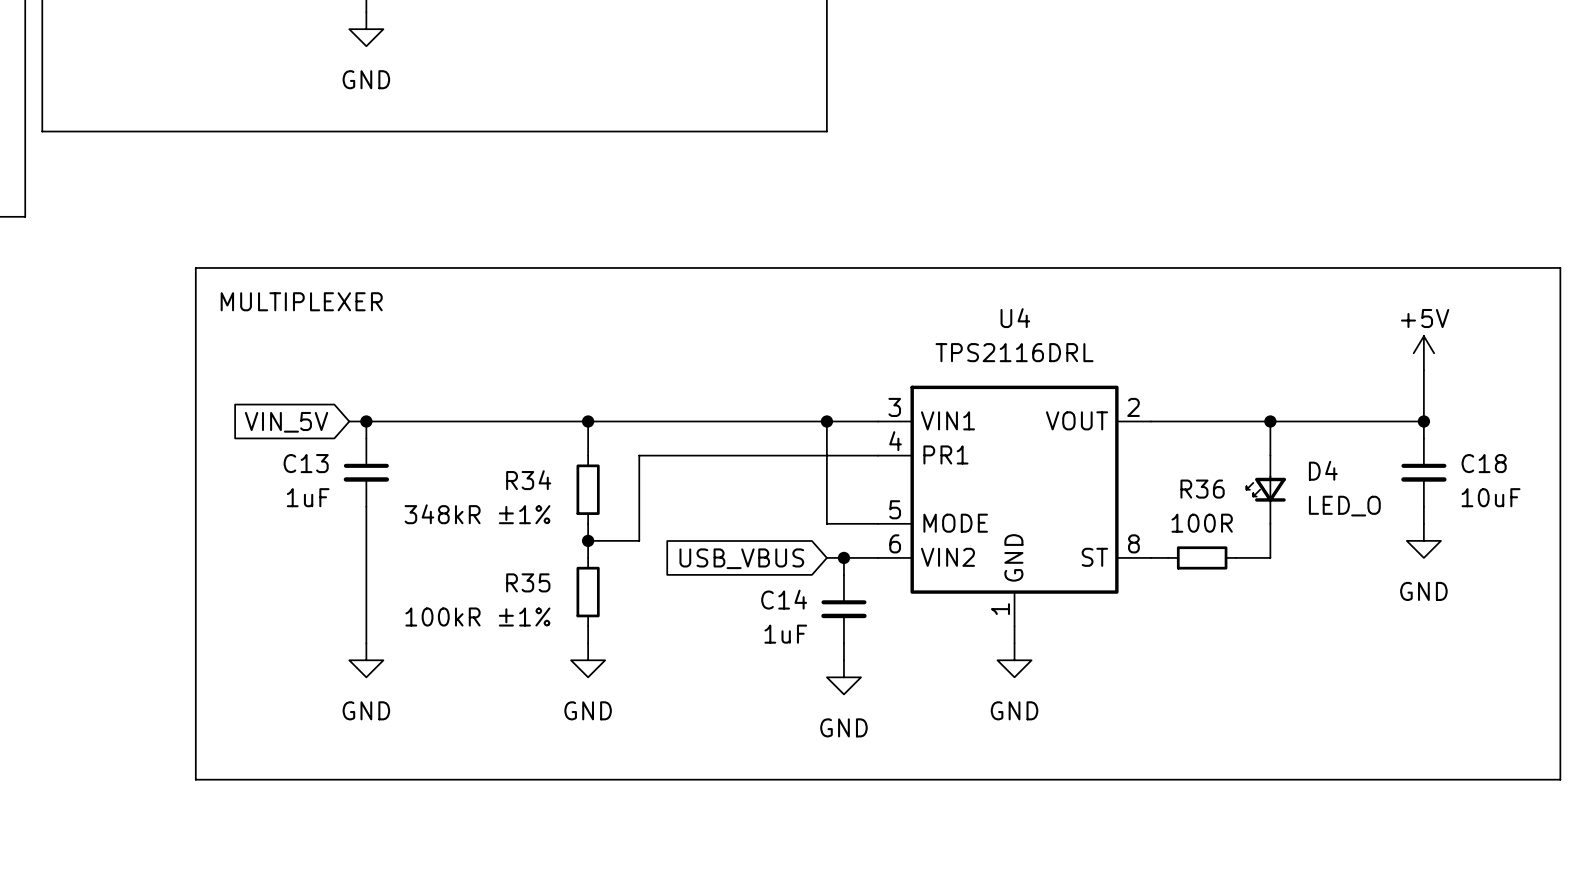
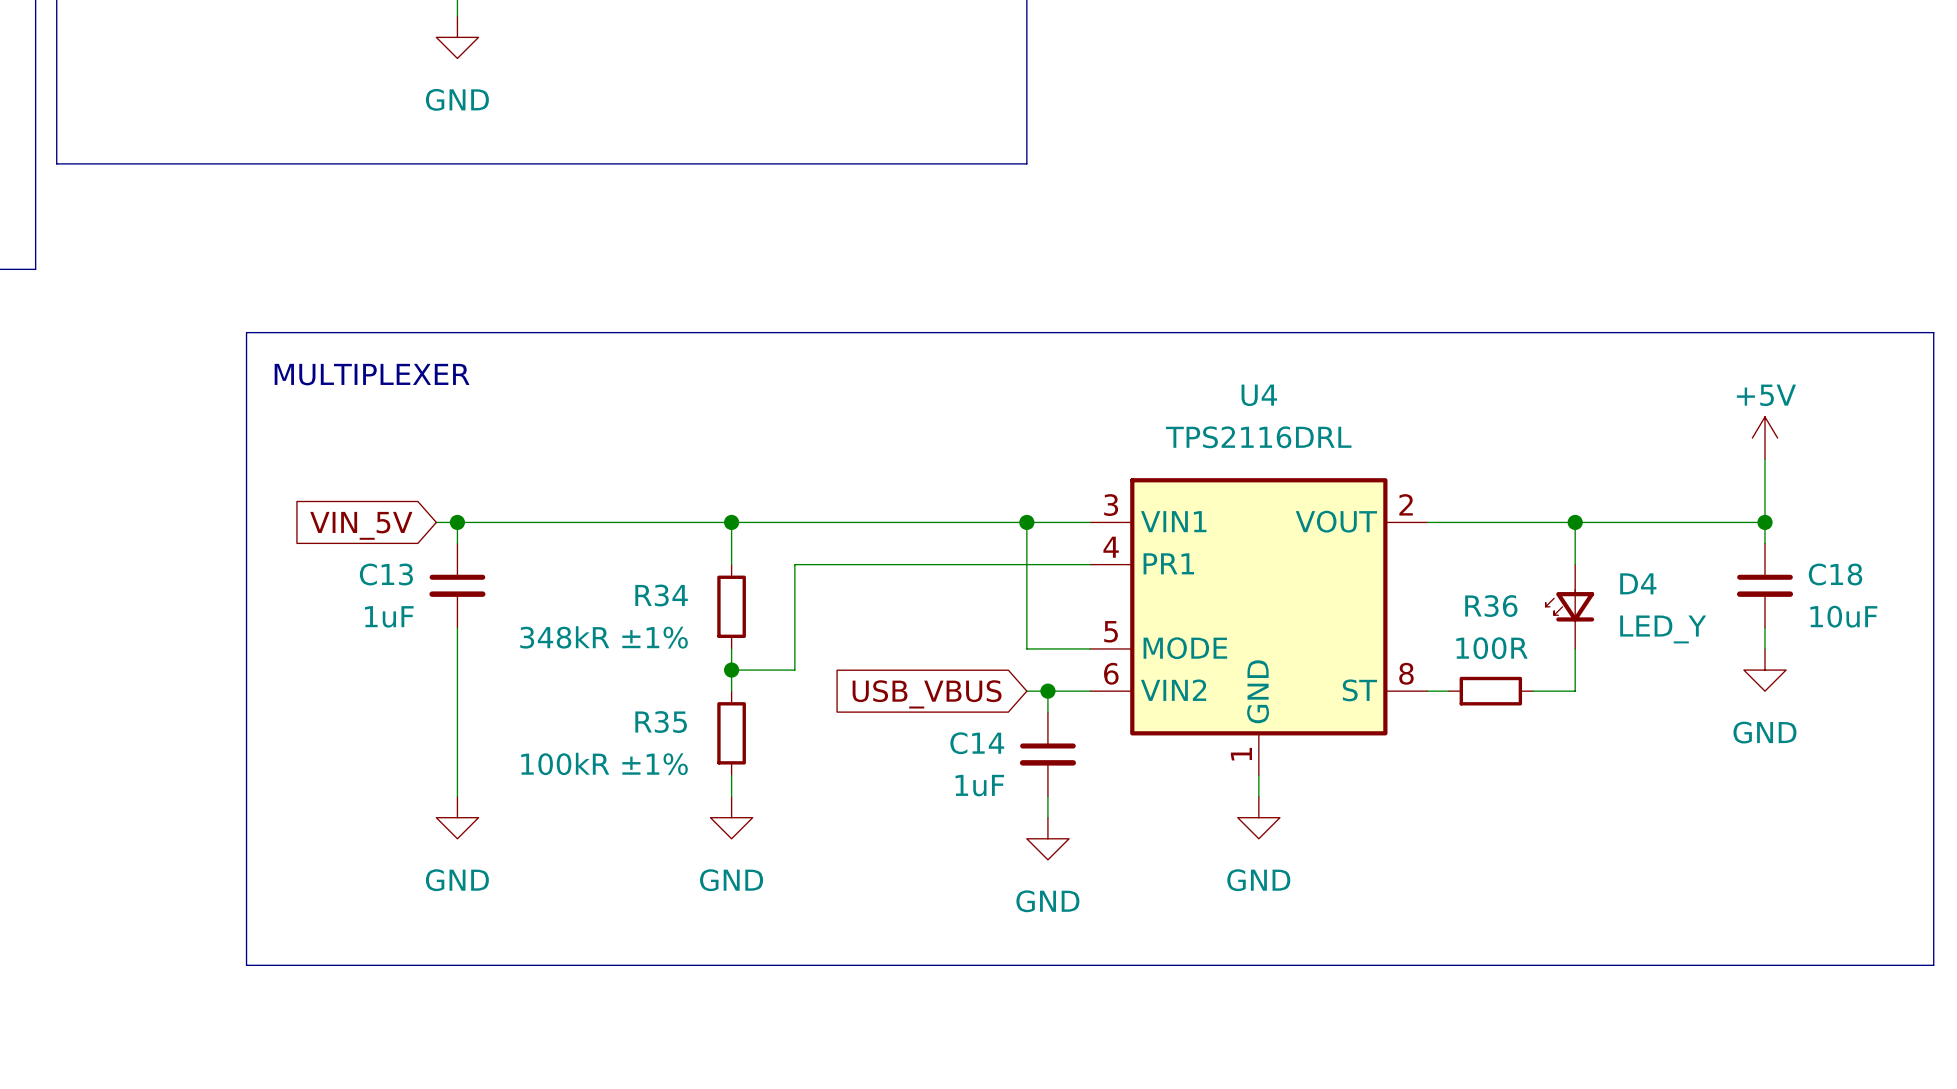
D4 value: LED_O (1344, 506) -> LED_Y (1663, 629)

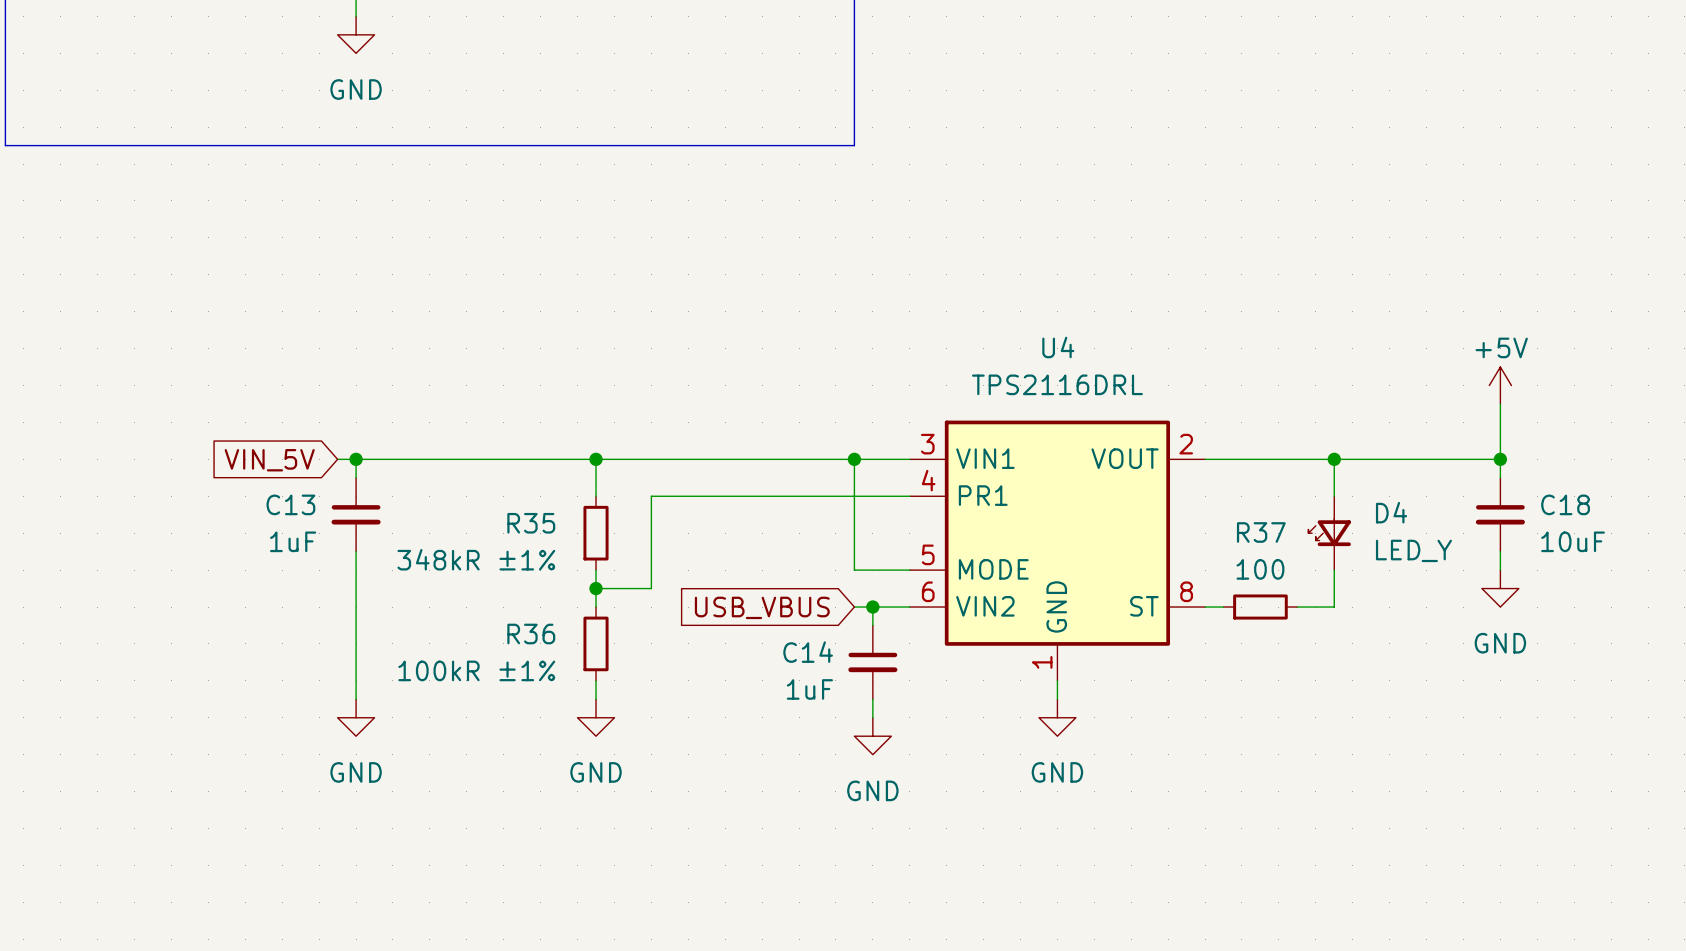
line: (246, 332) (1933, 332) (1933, 965) (246, 965) (246, 332) -> none
text: MULTIPLEXER (372, 374) -> none
R34 name: R34 (661, 595) -> R35 (531, 523)
R36 name: R36 (1491, 606) -> R37 (1261, 532)
R36 value: 100R (1492, 648) -> 100 (1260, 569)
R35 name: R35 (661, 722) -> R36 (531, 634)

